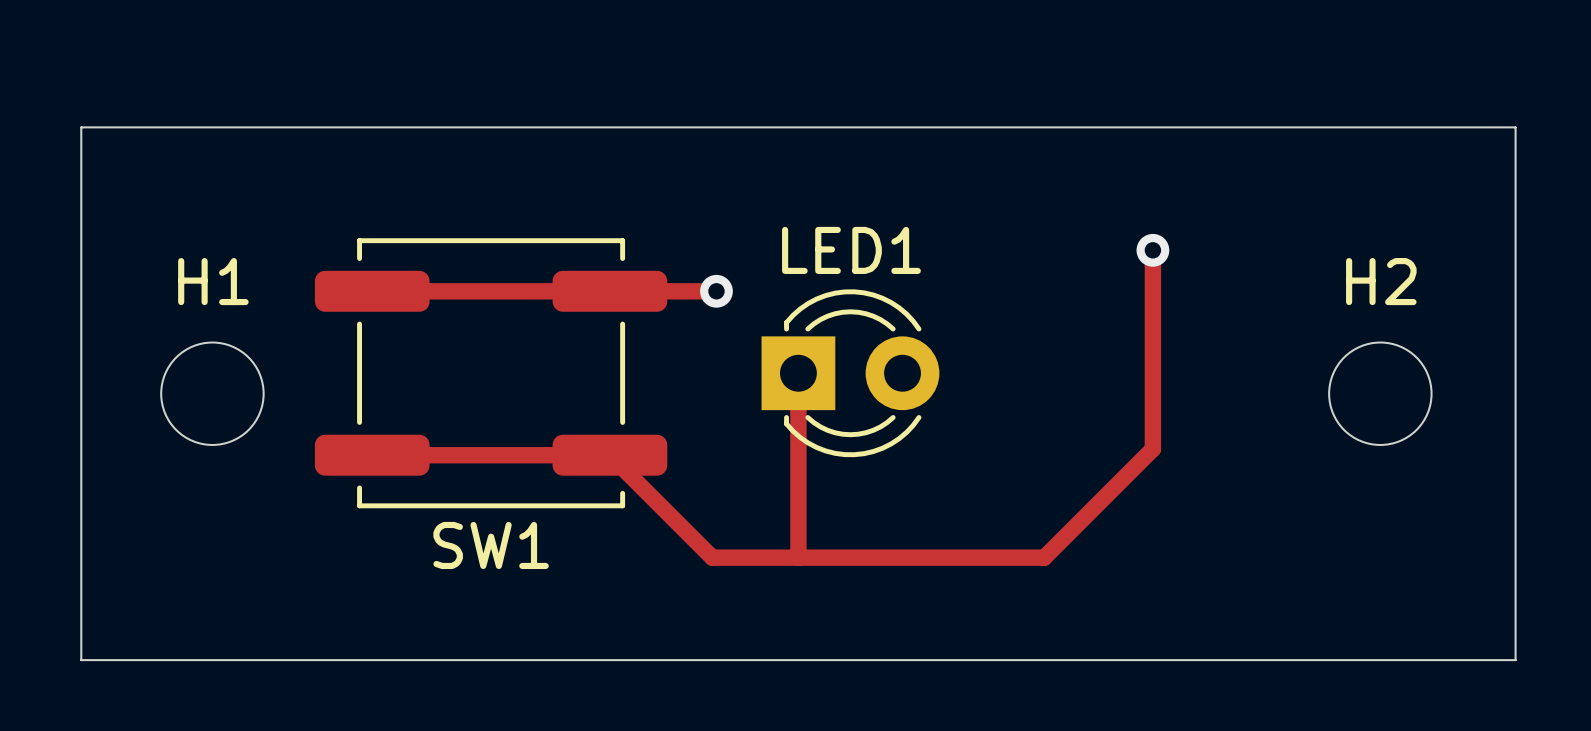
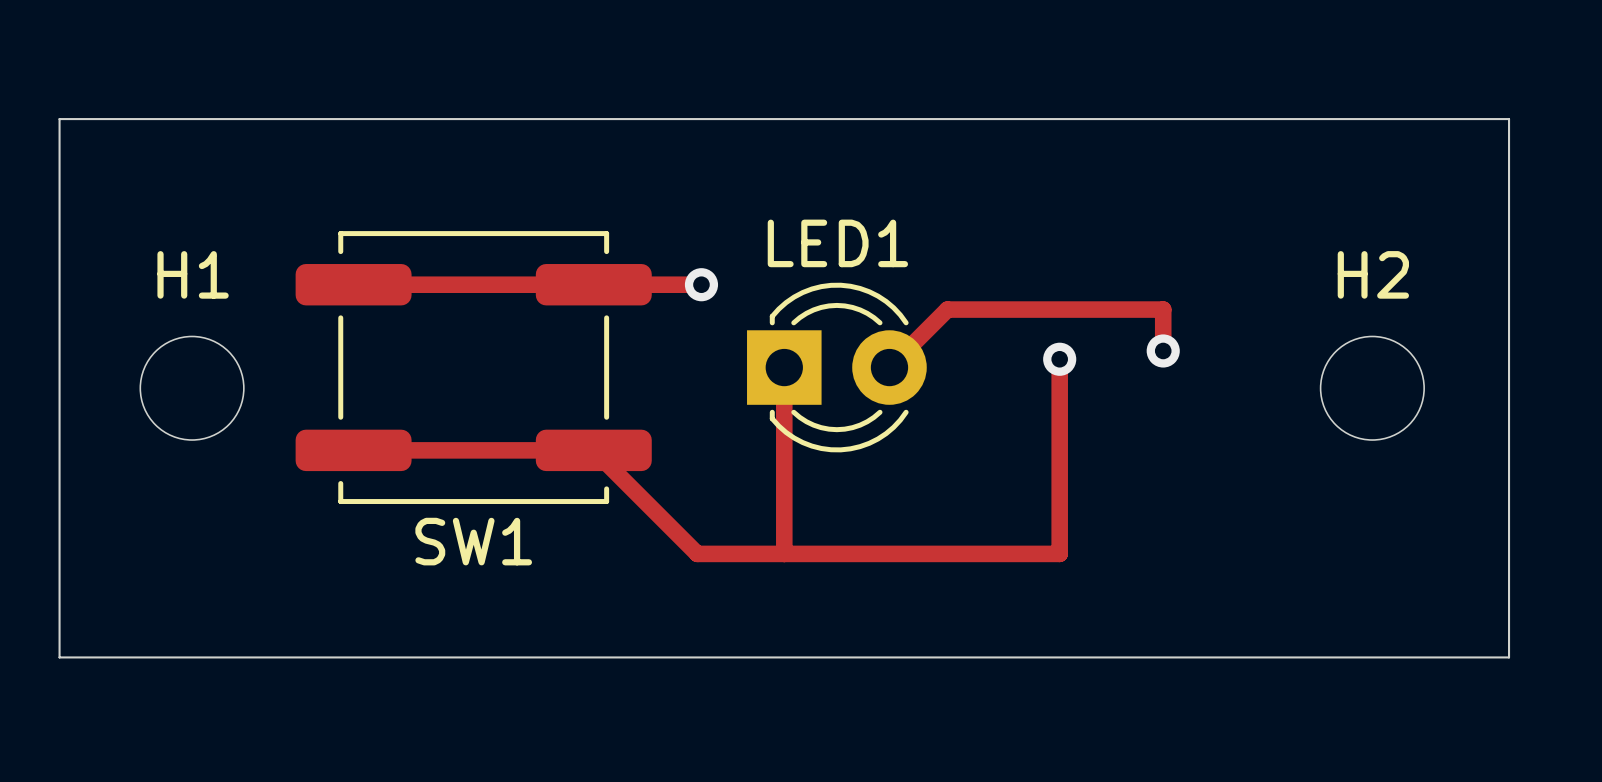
track: (1152, 250) (1152, 449) (1044, 557) -> (1059, 359) (1059, 553) (1032, 553)
via: (1152, 250) -> none
track: none -> (1163, 350) (1163, 309) (947, 309) (889, 367)
via: none -> (1163, 350)
via: none -> (1059, 359)

